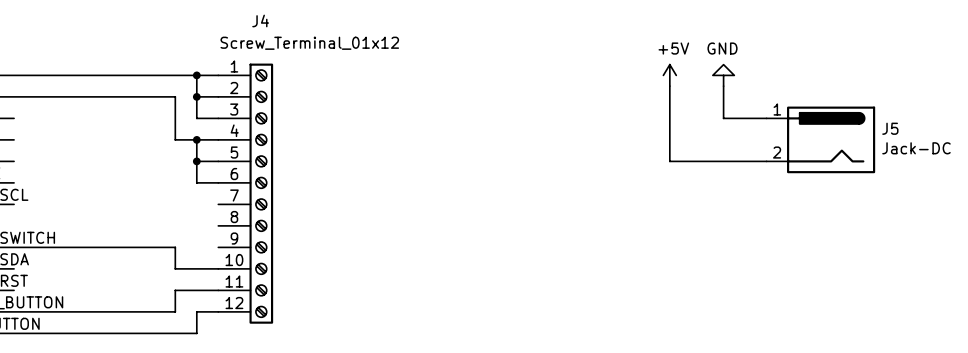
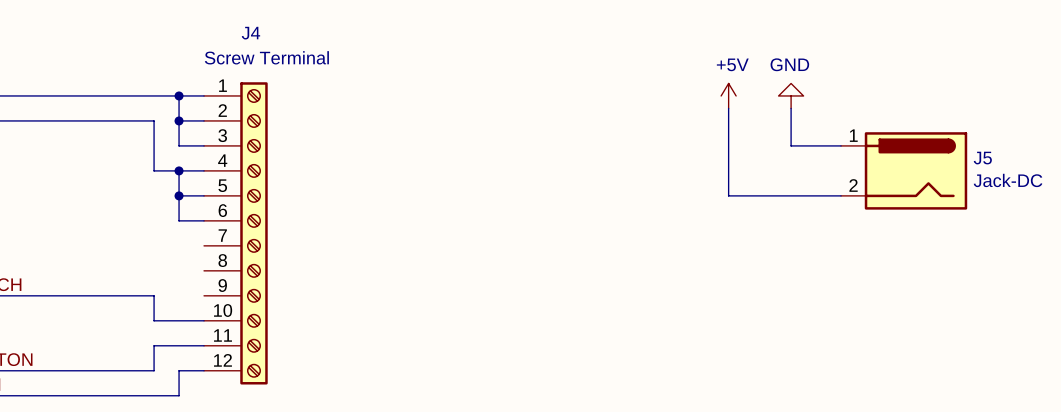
J4 value: Screw_Terminal_01x12 (309, 43) -> Screw Terminal (266, 57)

